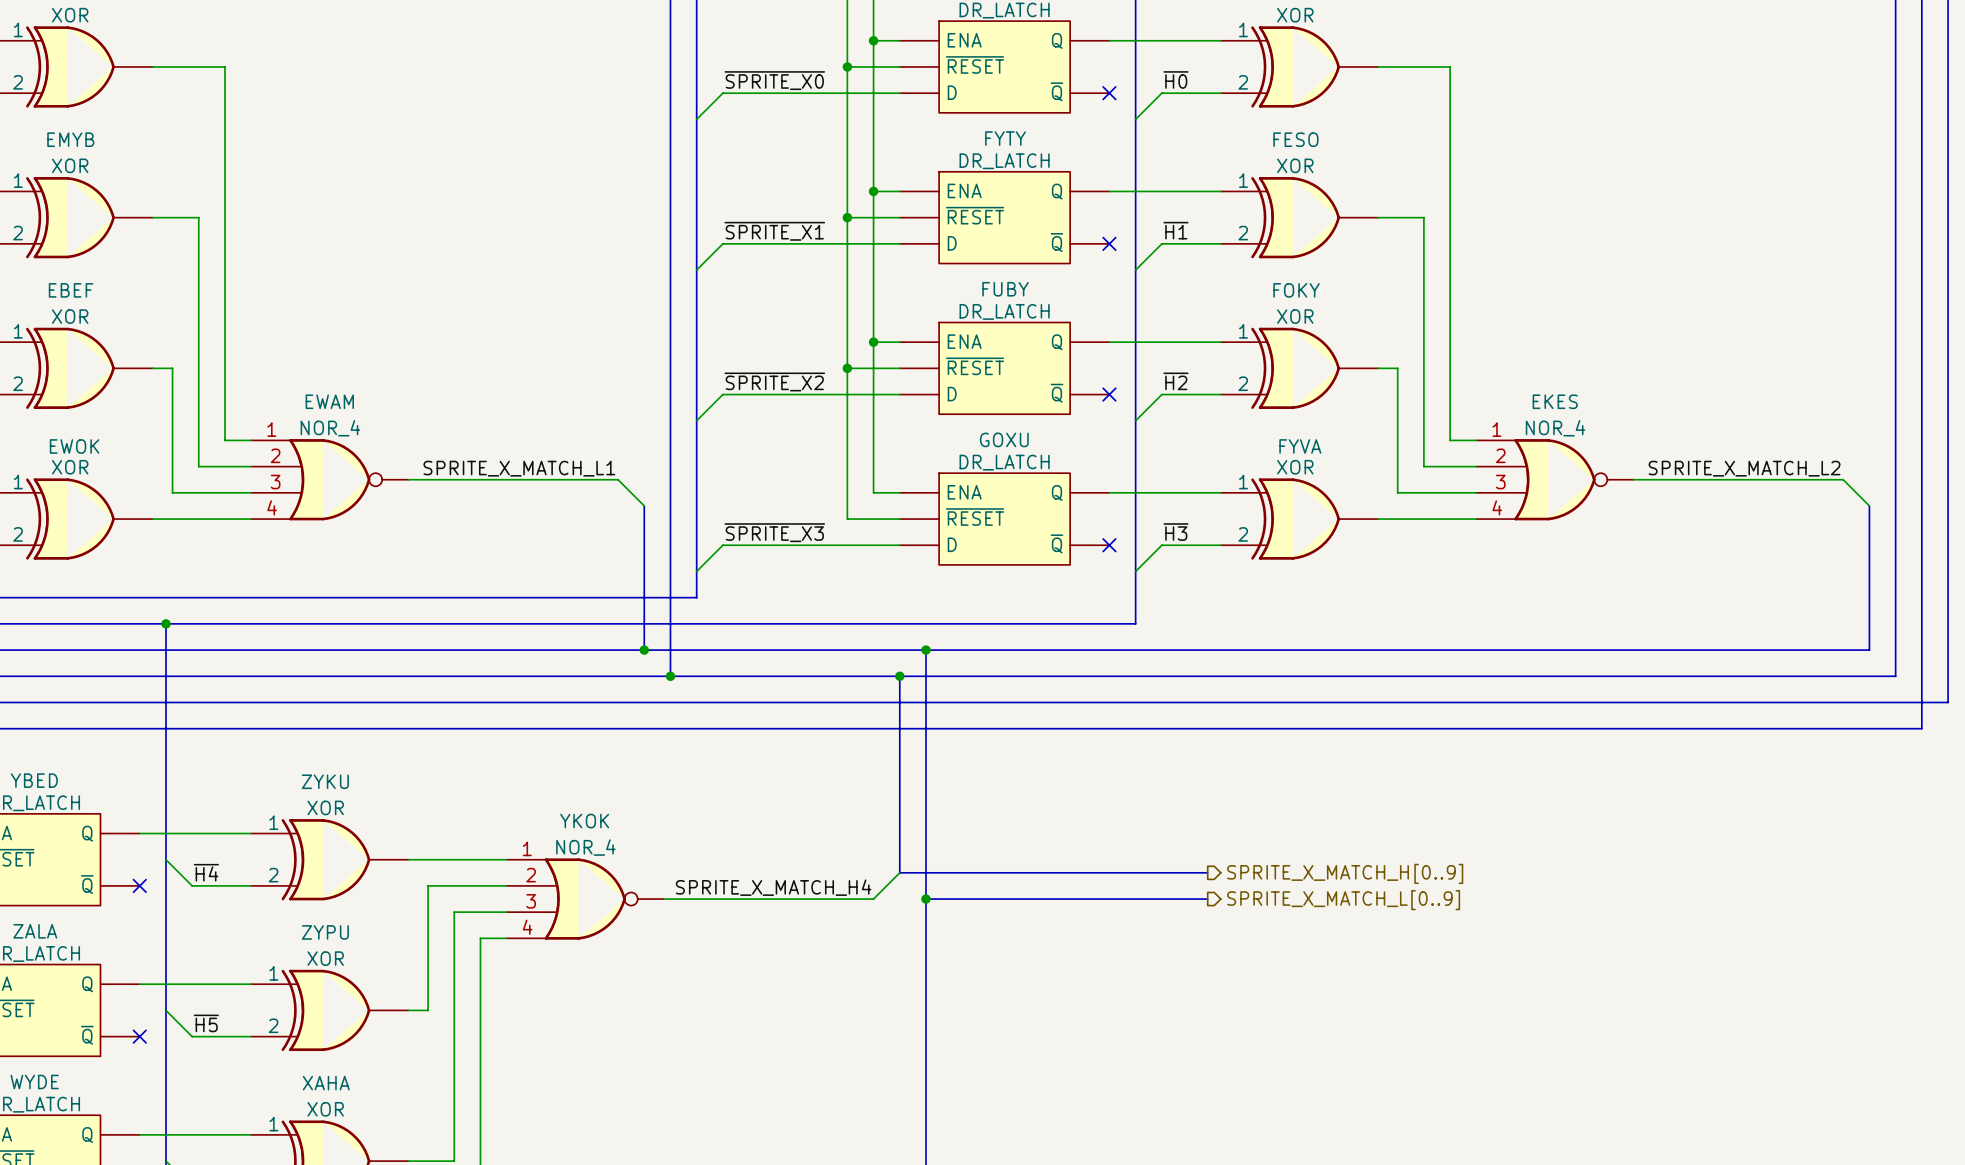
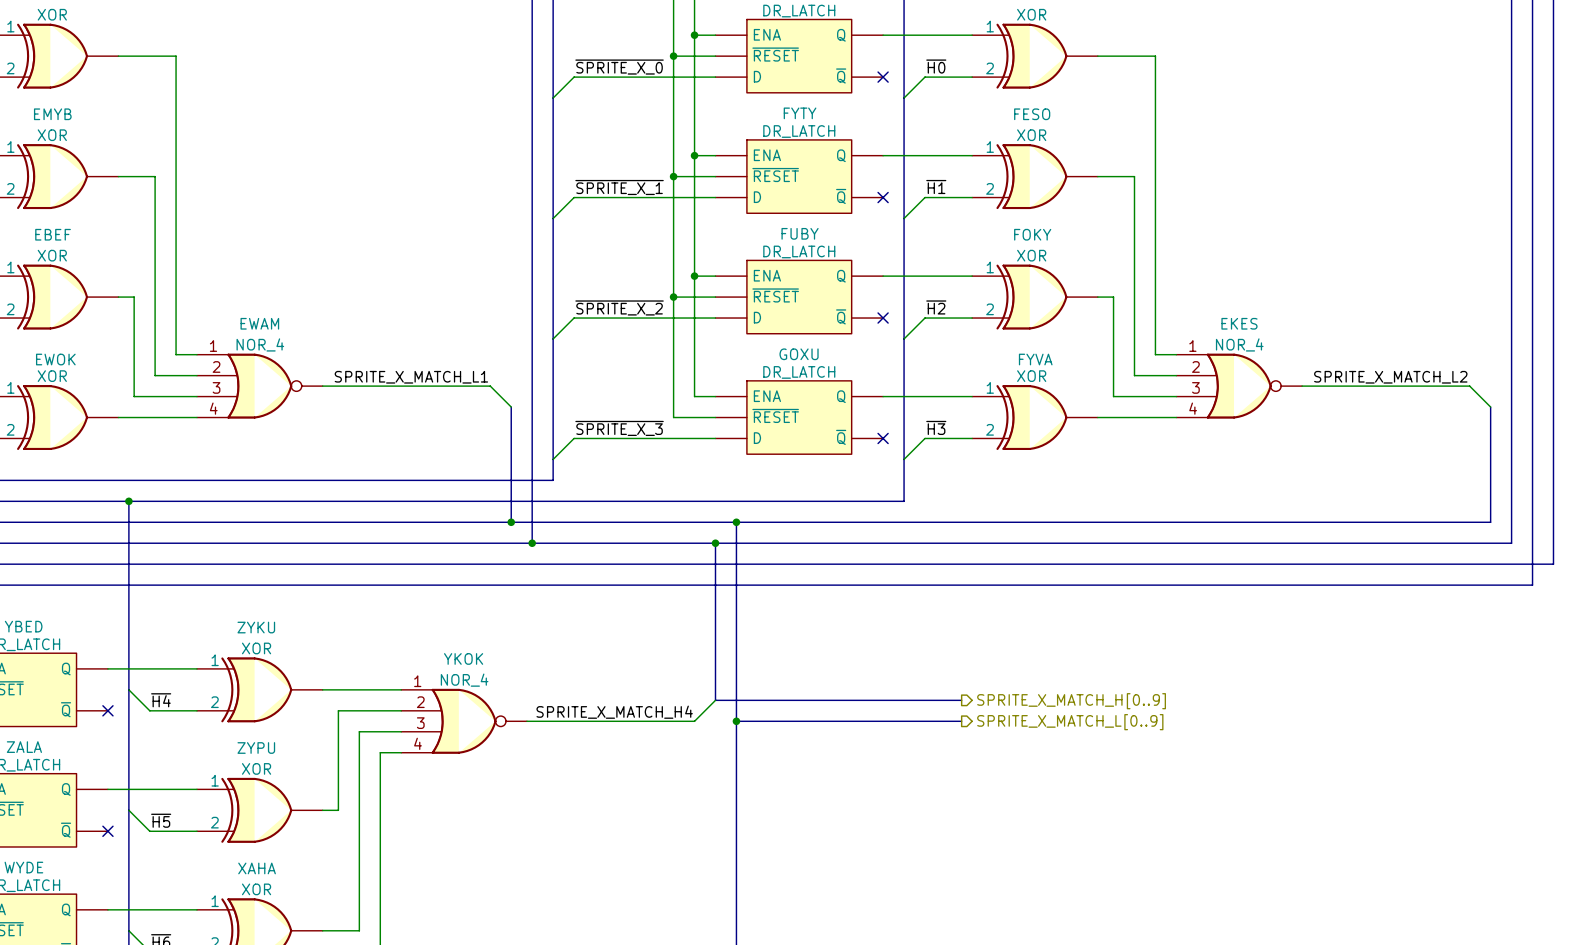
label: ~{SPRITE_X0} (774, 80) -> ~{SPRITE_X_0} (619, 67)
label: ~{SPRITE_X1} (774, 231) -> ~{SPRITE_X_1} (619, 187)
label: ~{SPRITE_X2} (774, 381) -> ~{SPRITE_X_2} (619, 307)
label: ~{SPRITE_X3} (774, 532) -> ~{SPRITE_X_3} (619, 428)

